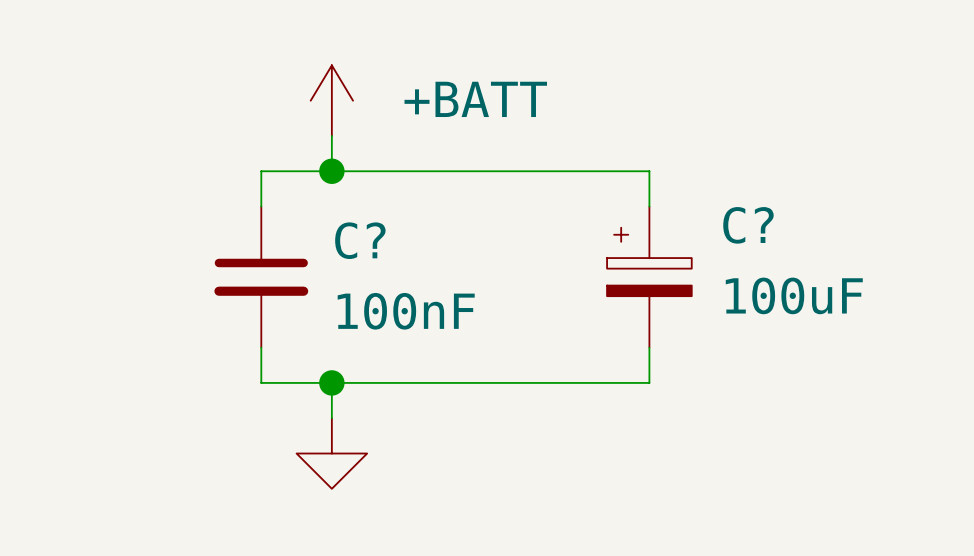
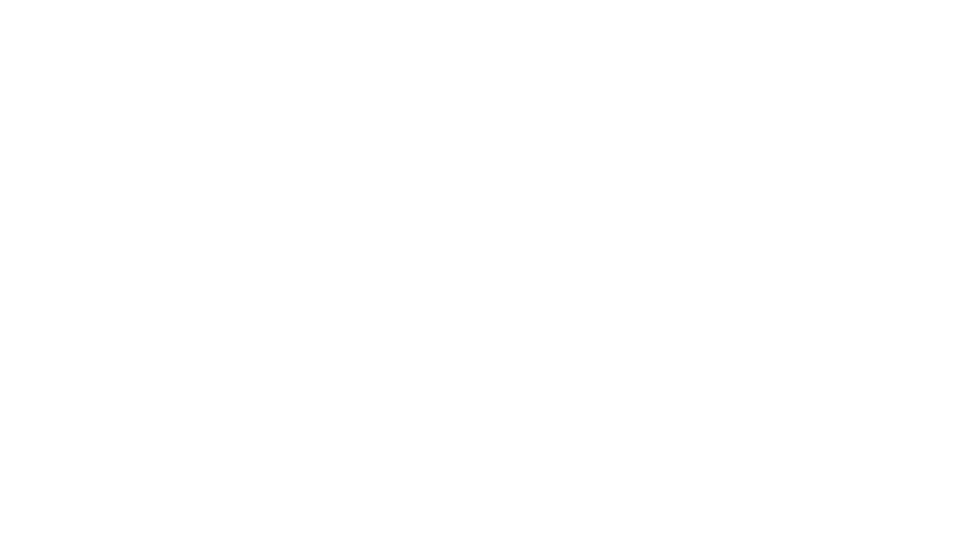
power symbol: +BATT (331, 100) -> none
wire: (331, 135) (331, 171) -> none
junction: (331, 171) -> none
wire: (261, 206) (261, 171) (649, 171) (649, 206) -> none
C?: 100nF (261, 277) -> none
C?: 100uF (649, 277) -> none
wire: (261, 347) (261, 382) (649, 382) (649, 347) -> none
wire: (331, 382) (331, 418) -> none
junction: (331, 382) -> none
power symbol: (331, 453) -> none

